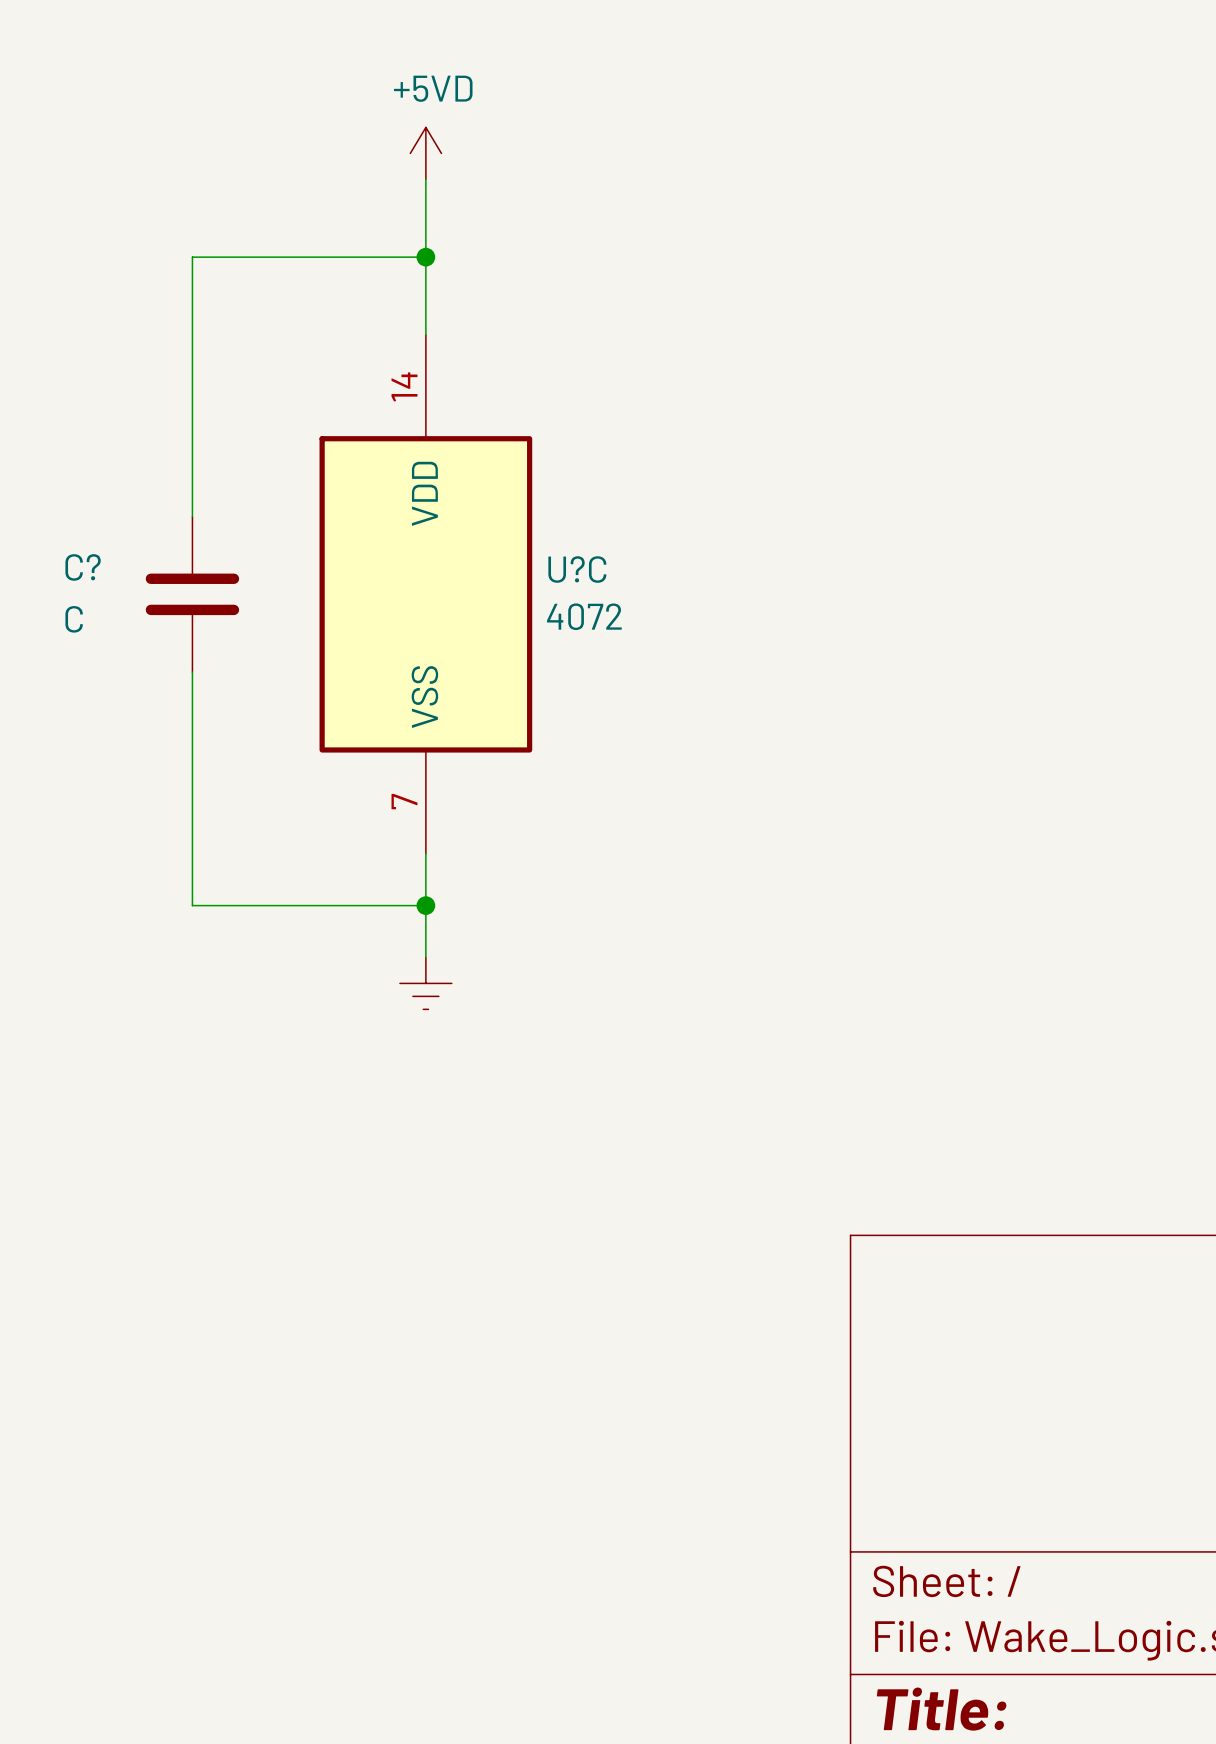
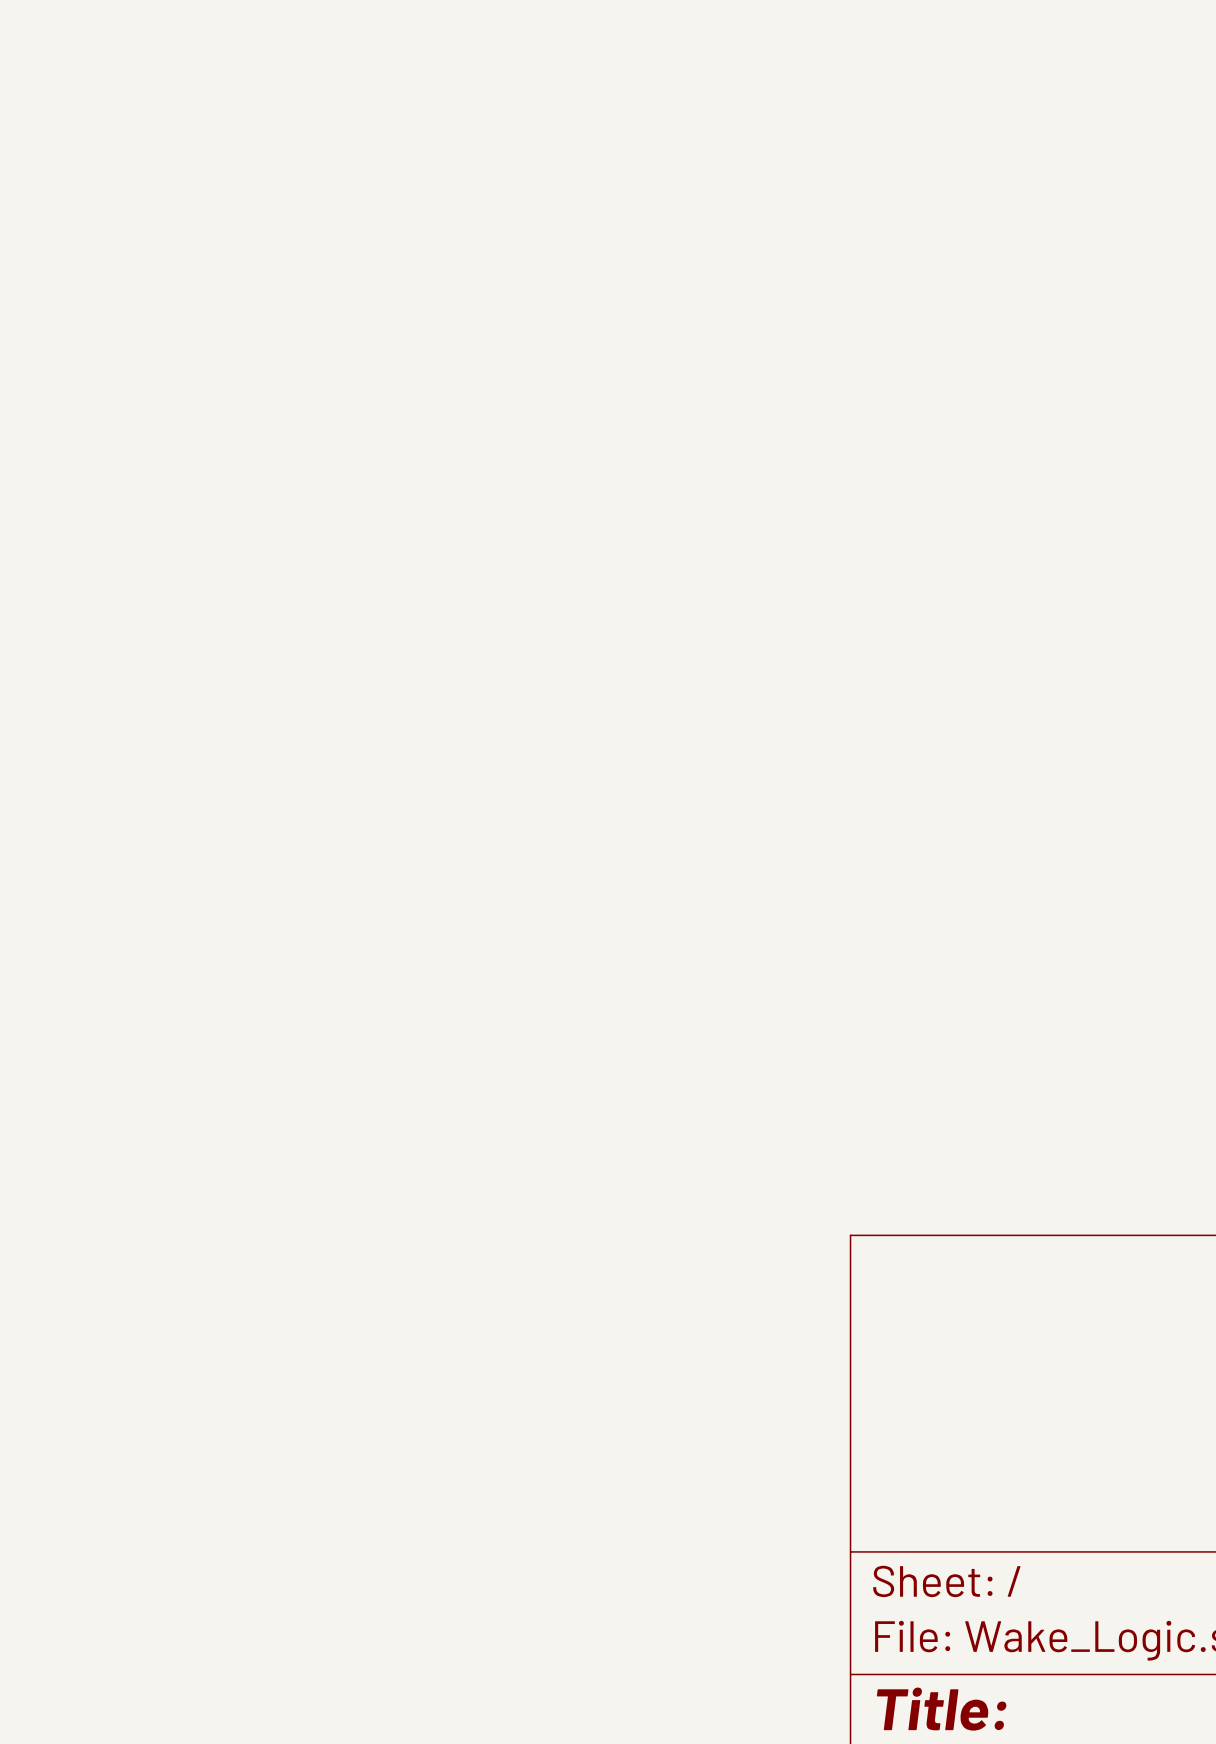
power symbol: +5VD (425, 153) -> none
wire: (425, 179) (425, 334) -> none
wire: (425, 257) (192, 257) (192, 516) -> none
junction: (425, 257) -> none
C?: C (192, 594) -> none
U?C: 4072 (425, 594) -> none
wire: (192, 672) (192, 905) (425, 905) -> none
wire: (425, 853) (425, 957) -> none
junction: (425, 905) -> none
power symbol: (425, 983) -> none

